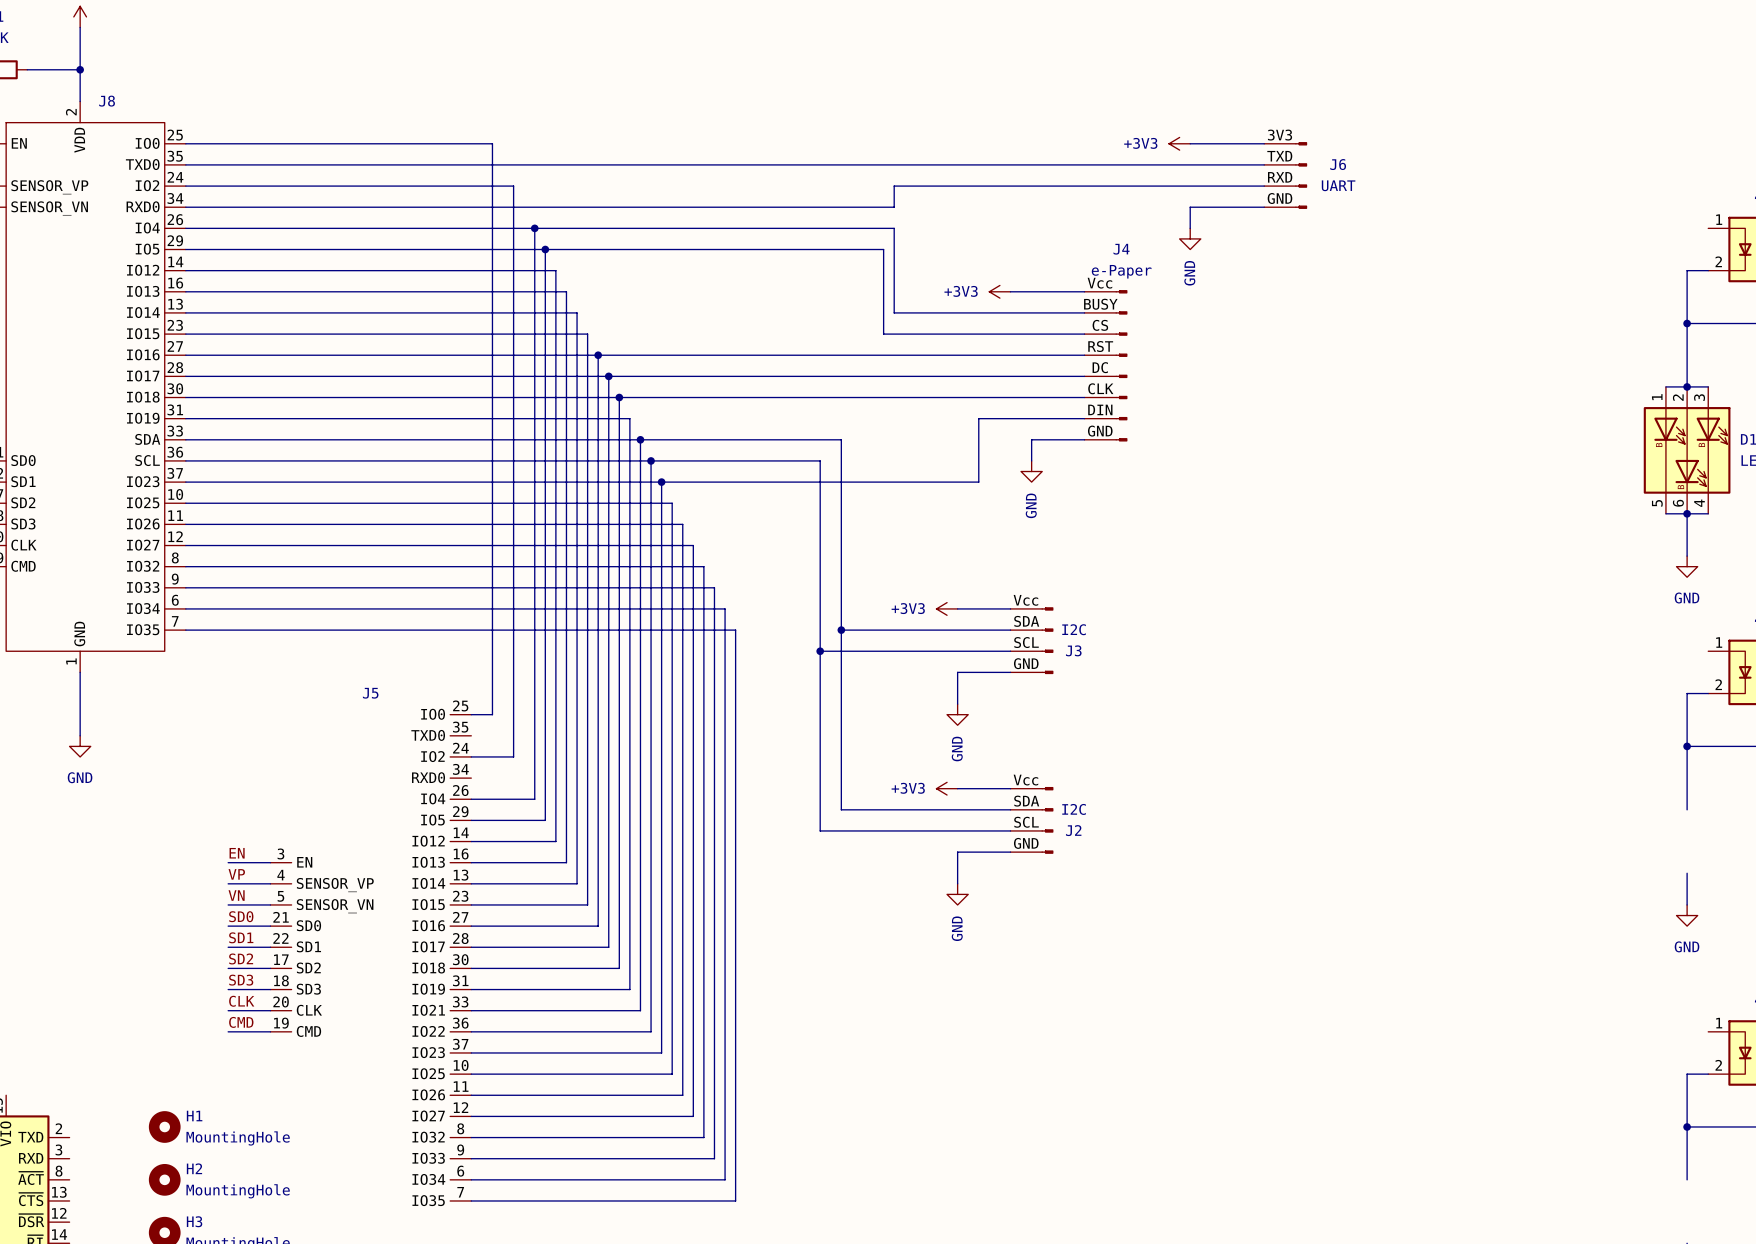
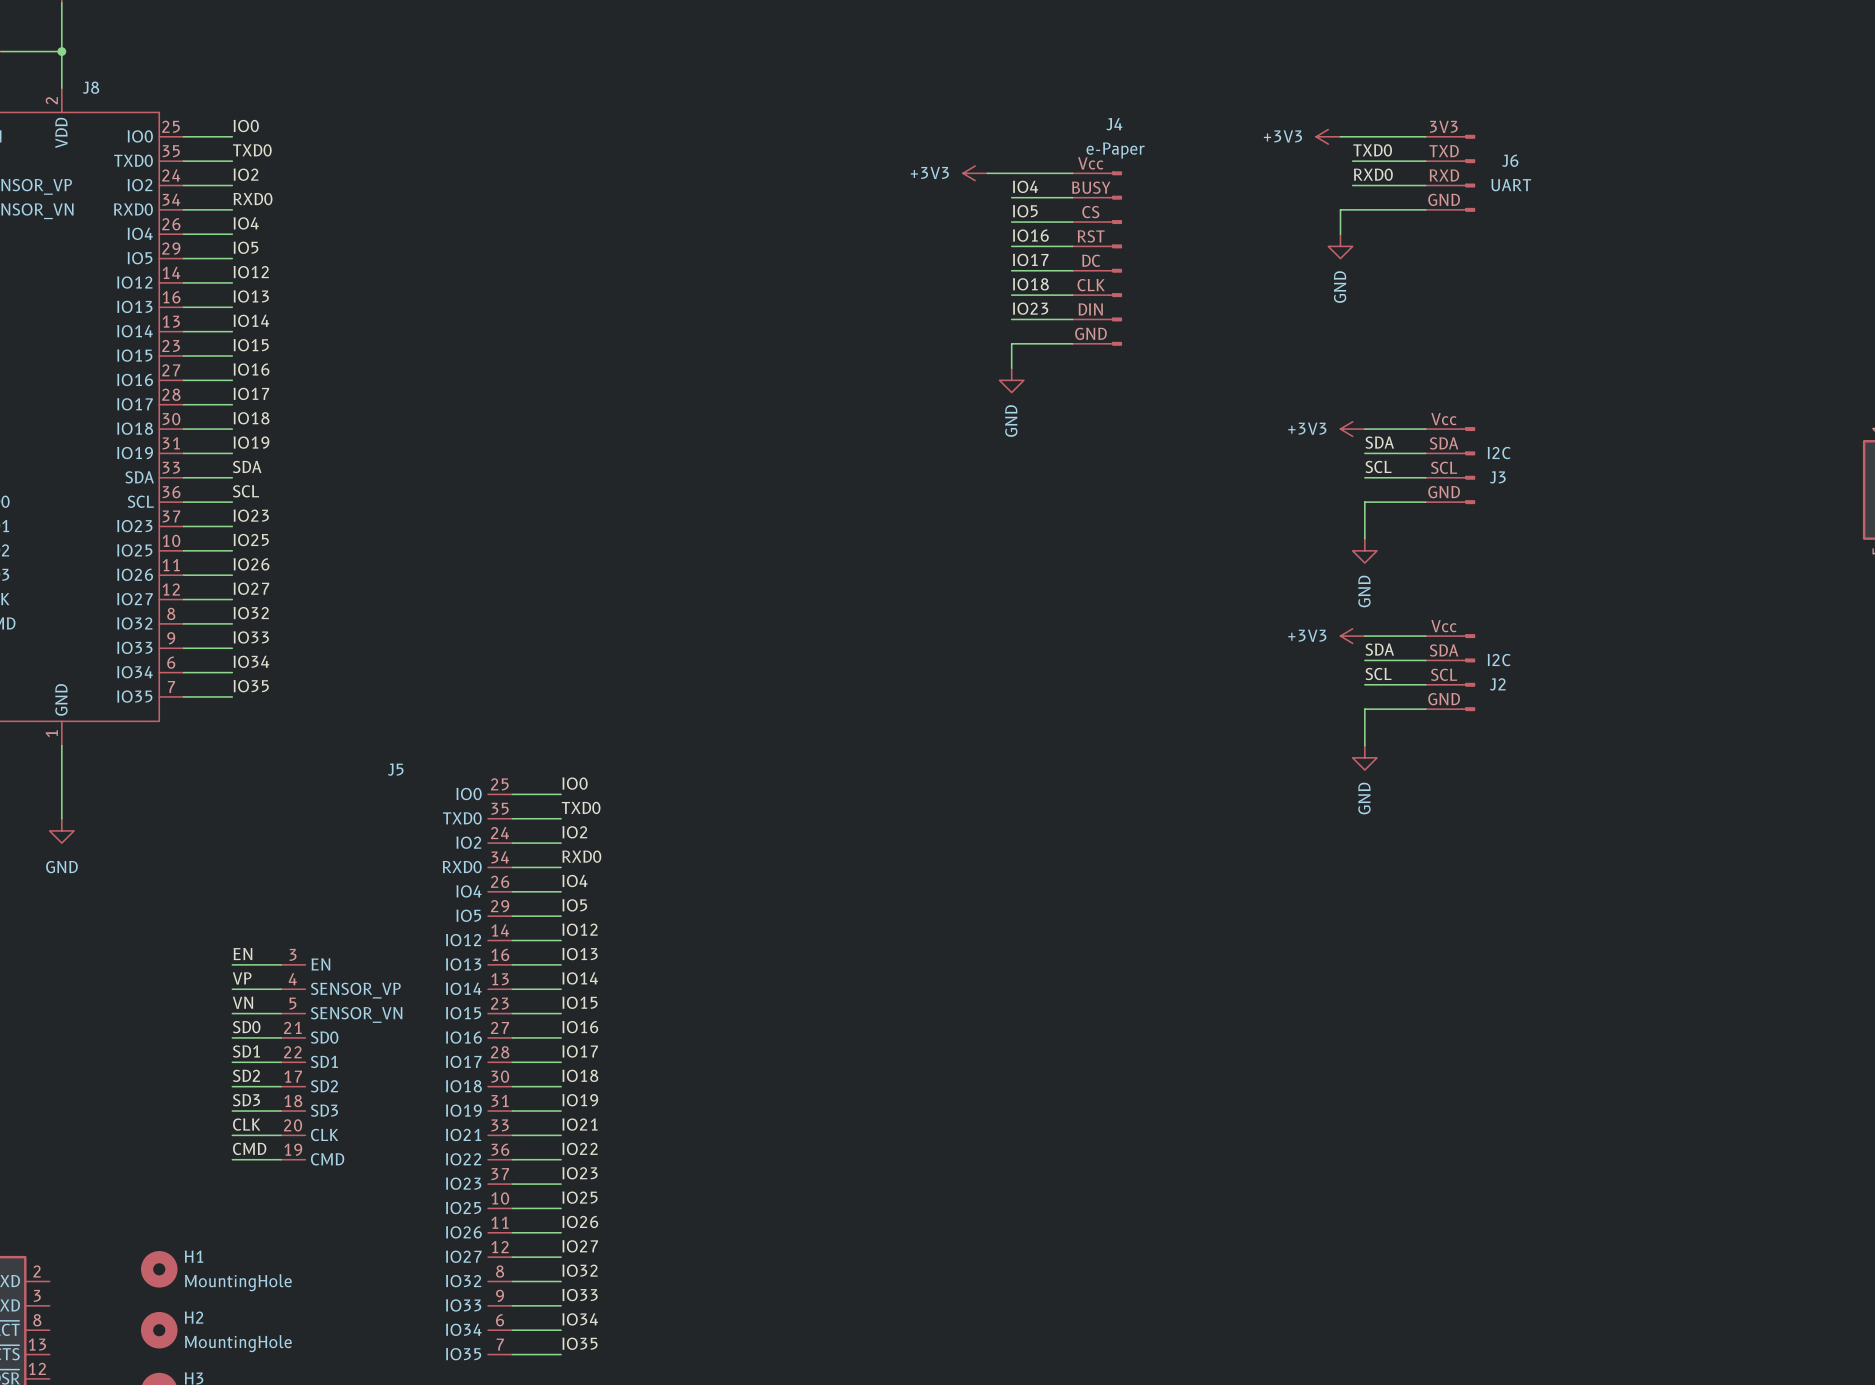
label: none -> IO0 (246, 126)
wire: (228, 143) (492, 143) (492, 714) -> (561, 794) (536, 794)
label: none -> TXD0 (252, 150)
label: none -> TXD0 (1372, 150)
wire: (228, 164) (1200, 164) -> none
power symbol: none -> +3V3 (975, 173)
label: none -> IO2 (246, 174)
label: none -> RXD0 (1373, 174)
wire: (228, 186) (513, 186) (513, 756) -> none
wire: (1200, 186) (894, 186) (894, 207) (228, 207) -> none
label: none -> IO4 (1025, 186)
wire: none -> (1011, 197) (1072, 197)
label: none -> RXD0 (253, 199)
label: none -> IO5 (1025, 211)
wire: none -> (1011, 222) (1072, 222)
label: none -> IO4 (246, 223)
wire: (228, 228) (894, 228) (894, 312) (1084, 312) -> none
wire: (534, 228) (534, 799) (513, 799) -> none
junction: (534, 228) -> none
label: none -> IO16 (1030, 235)
wire: none -> (1011, 246) (1072, 246)
label: none -> IO5 (245, 247)
wire: (228, 249) (883, 249) (883, 334) (1084, 334) -> none
wire: (545, 249) (545, 820) (513, 820) -> none
junction: (545, 249) -> none
label: none -> IO17 (1030, 259)
wire: none -> (1011, 270) (1072, 270)
label: none -> IO12 (251, 272)
wire: (228, 270) (555, 270) (555, 841) (513, 841) -> none
label: none -> IO18 (1030, 284)
wire: none -> (1011, 295) (1072, 295)
label: none -> IO13 (251, 296)
wire: (228, 291) (566, 291) (566, 862) (513, 862) -> none
power symbol: +3V3 (999, 291) -> none
wire: (1010, 291) (1084, 291) -> (987, 173) (1072, 173)
label: none -> IO23 (1030, 308)
wire: none -> (1011, 319) (1072, 319)
label: none -> IO14 (251, 320)
wire: (228, 312) (577, 312) (577, 883) (513, 883) -> none
label: none -> IO15 (251, 345)
wire: (228, 334) (587, 334) (587, 904) (513, 904) -> none
label: none -> IO16 (251, 369)
wire: (228, 355) (1084, 355) -> none
wire: (598, 355) (598, 926) (513, 926) -> none
junction: (598, 355) -> none
power symbol: none -> GND (1011, 380)
J4 position: (1105, 365) -> (1097, 258)
label: none -> IO17 (251, 393)
wire: (228, 376) (1084, 376) -> none
wire: (608, 376) (608, 947) (513, 947) -> none
junction: (608, 376) -> none
label: none -> IO18 (251, 418)
wire: (228, 397) (1084, 397) -> none
wire: (619, 397) (619, 968) (513, 968) -> none
junction: (619, 397) -> none
power symbol: none -> +3V3 (1352, 429)
wire: none -> (1364, 429) (1425, 429)
label: none -> IO19 (251, 442)
label: none -> SDA (1379, 442)
wire: (228, 418) (629, 418) (629, 989) (513, 989) -> none
wire: (1084, 418) (978, 418) (978, 482) (228, 482) -> none
wire: none -> (1364, 453) (1425, 453)
label: none -> SDA (247, 466)
label: none -> SCL (1378, 466)
wire: (228, 439) (841, 439) (841, 809) (1010, 809) -> none
wire: (640, 439) (640, 1010) (513, 1010) -> none
junction: (640, 439) -> none
wire: (1084, 439) (1031, 439) (1031, 460) -> (1072, 343) (1011, 343) (1011, 368)
wire: none -> (1364, 477) (1425, 477)
label: none -> SCL (246, 491)
wire: (228, 460) (820, 460) (820, 830) (1010, 830) -> none
wire: (651, 460) (651, 1031) (513, 1031) -> none
junction: (651, 460) -> none
wire: none -> (1425, 502) (1364, 502) (1364, 538)
power symbol: GND (1031, 471) -> none
label: none -> IO23 (251, 515)
wire: (661, 482) (661, 1052) (513, 1052) -> none
junction: (661, 482) -> none
label: none -> IO25 (251, 540)
wire: (228, 503) (672, 503) (672, 1074) (513, 1074) -> none
power symbol: none -> GND (1364, 550)
label: none -> IO26 (251, 564)
wire: (228, 524) (682, 524) (682, 1095) (513, 1095) -> none
label: none -> IO27 (251, 588)
wire: (228, 545) (693, 545) (693, 1116) (513, 1116) -> none
label: none -> IO32 (251, 613)
wire: (228, 566) (703, 566) (703, 1137) (513, 1137) -> none
power symbol: none -> +3V3 (1352, 636)
wire: none -> (1364, 636) (1425, 636)
label: none -> IO33 (251, 637)
wire: (228, 587) (714, 587) (714, 1158) (513, 1158) -> none
label: none -> SDA (1379, 649)
wire: none -> (1364, 660) (1425, 660)
label: none -> IO34 (251, 661)
wire: (228, 608) (725, 608) (725, 1179) (513, 1179) -> none
power symbol: +3V3 (947, 608) -> none
wire: (957, 608) (1010, 608) -> none
label: none -> SCL (1378, 673)
wire: none -> (1364, 684) (1425, 684)
label: none -> IO35 (251, 686)
wire: (228, 630) (735, 630) (735, 1200) (513, 1200) -> none
wire: (841, 630) (1010, 630) -> none
junction: (841, 630) -> none
J3 position: (1031, 640) -> (1450, 465)
wire: none -> (1425, 709) (1364, 709) (1364, 745)
wire: (820, 651) (1010, 651) -> none
junction: (820, 651) -> none
wire: (1010, 672) (957, 672) (957, 704) -> none
power symbol: none -> GND (1364, 757)
label: none -> IO0 (575, 783)
power symbol: GND (957, 714) -> none
label: none -> TXD0 (581, 807)
wire: none -> (512, 818) (561, 818)
label: none -> IO2 (574, 832)
label: none -> RXD0 (581, 856)
wire: none -> (512, 867) (561, 867)
power symbol: +3V3 (947, 788) -> none
wire: (957, 788) (1010, 788) -> none
label: none -> IO4 (574, 881)
label: none -> IO5 (574, 905)
J2 position: (1031, 820) -> (1450, 672)
label: none -> IO12 (580, 929)
wire: (1010, 852) (957, 852) (957, 883) -> none
label: none -> IO13 (580, 954)
label: none -> IO14 (580, 978)
power symbol: GND (957, 894) -> none
label: none -> IO15 (579, 1002)
label: none -> IO16 (580, 1027)
label: none -> IO17 (580, 1051)
label: none -> IO18 (580, 1075)
label: none -> IO19 (580, 1100)
label: none -> IO21 (579, 1124)
label: none -> IO22 (580, 1148)
label: none -> IO23 (580, 1173)
label: none -> IO25 (579, 1197)
label: none -> IO26 (580, 1221)
label: none -> IO27 (580, 1246)
label: none -> IO32 (580, 1270)
label: none -> IO33 (580, 1295)
label: none -> IO34 (580, 1319)
label: none -> IO35 (579, 1343)

